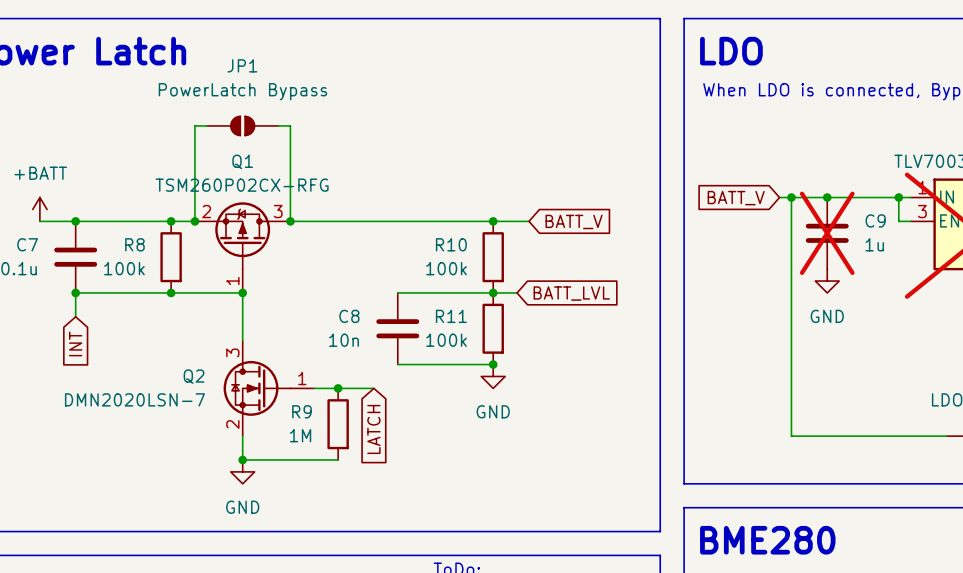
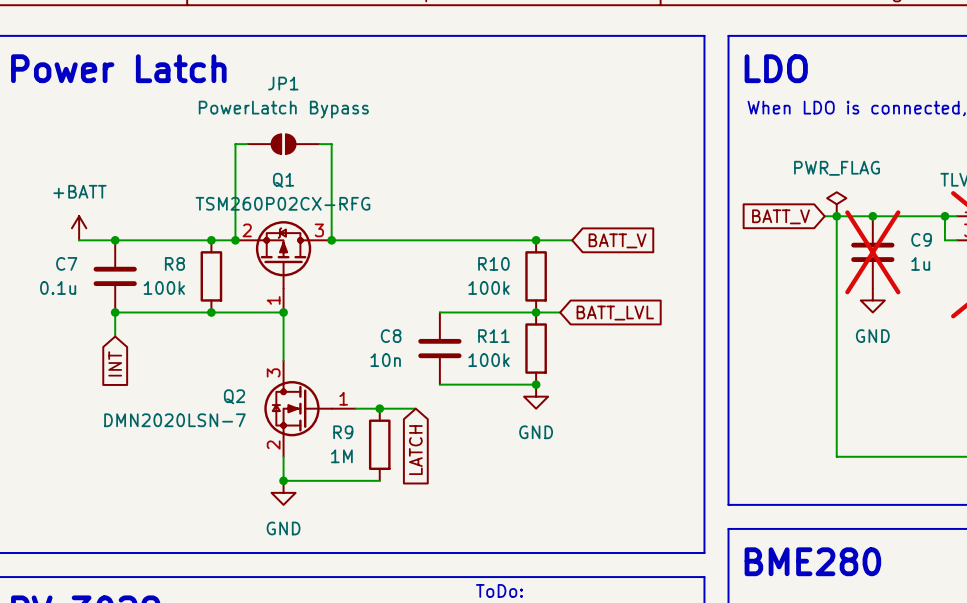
power symbol: none -> PWR_FLAG (836, 204)

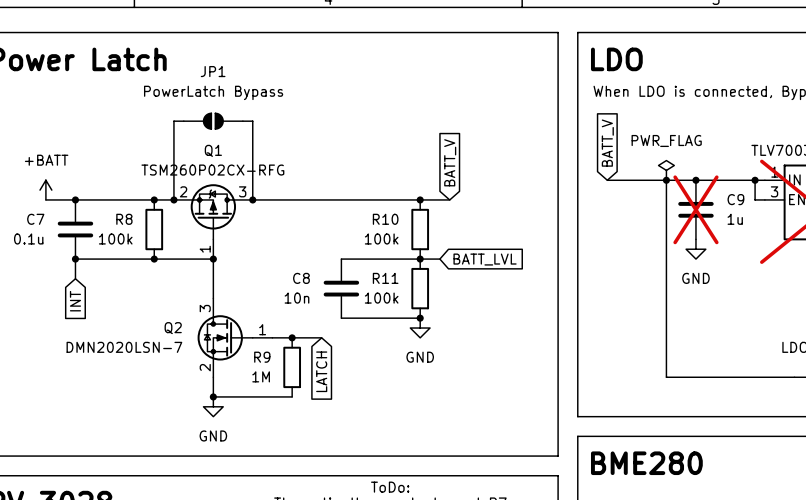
wire: none -> (607, 180) (656, 180)
global label rotation: 0° (781, 216) -> 90° clockwise (607, 143)
global label rotation: 0° (617, 240) -> 90° counterclockwise (450, 162)

